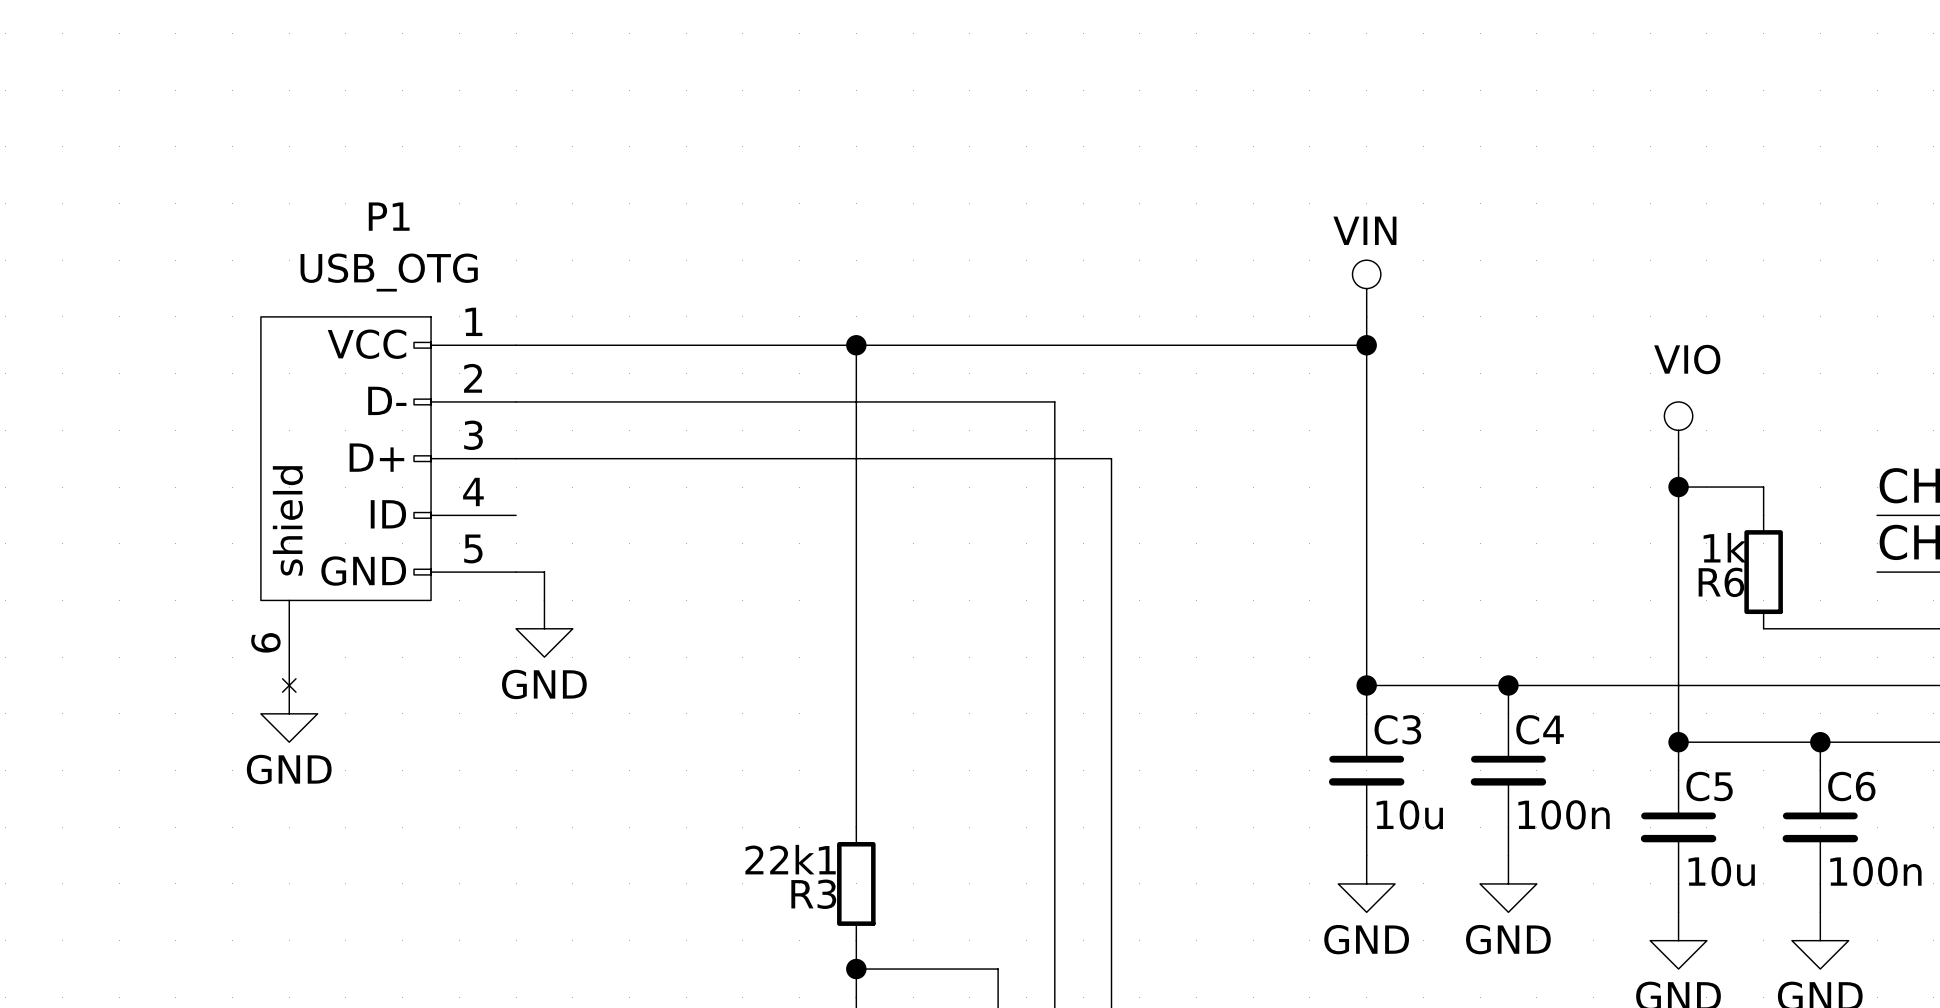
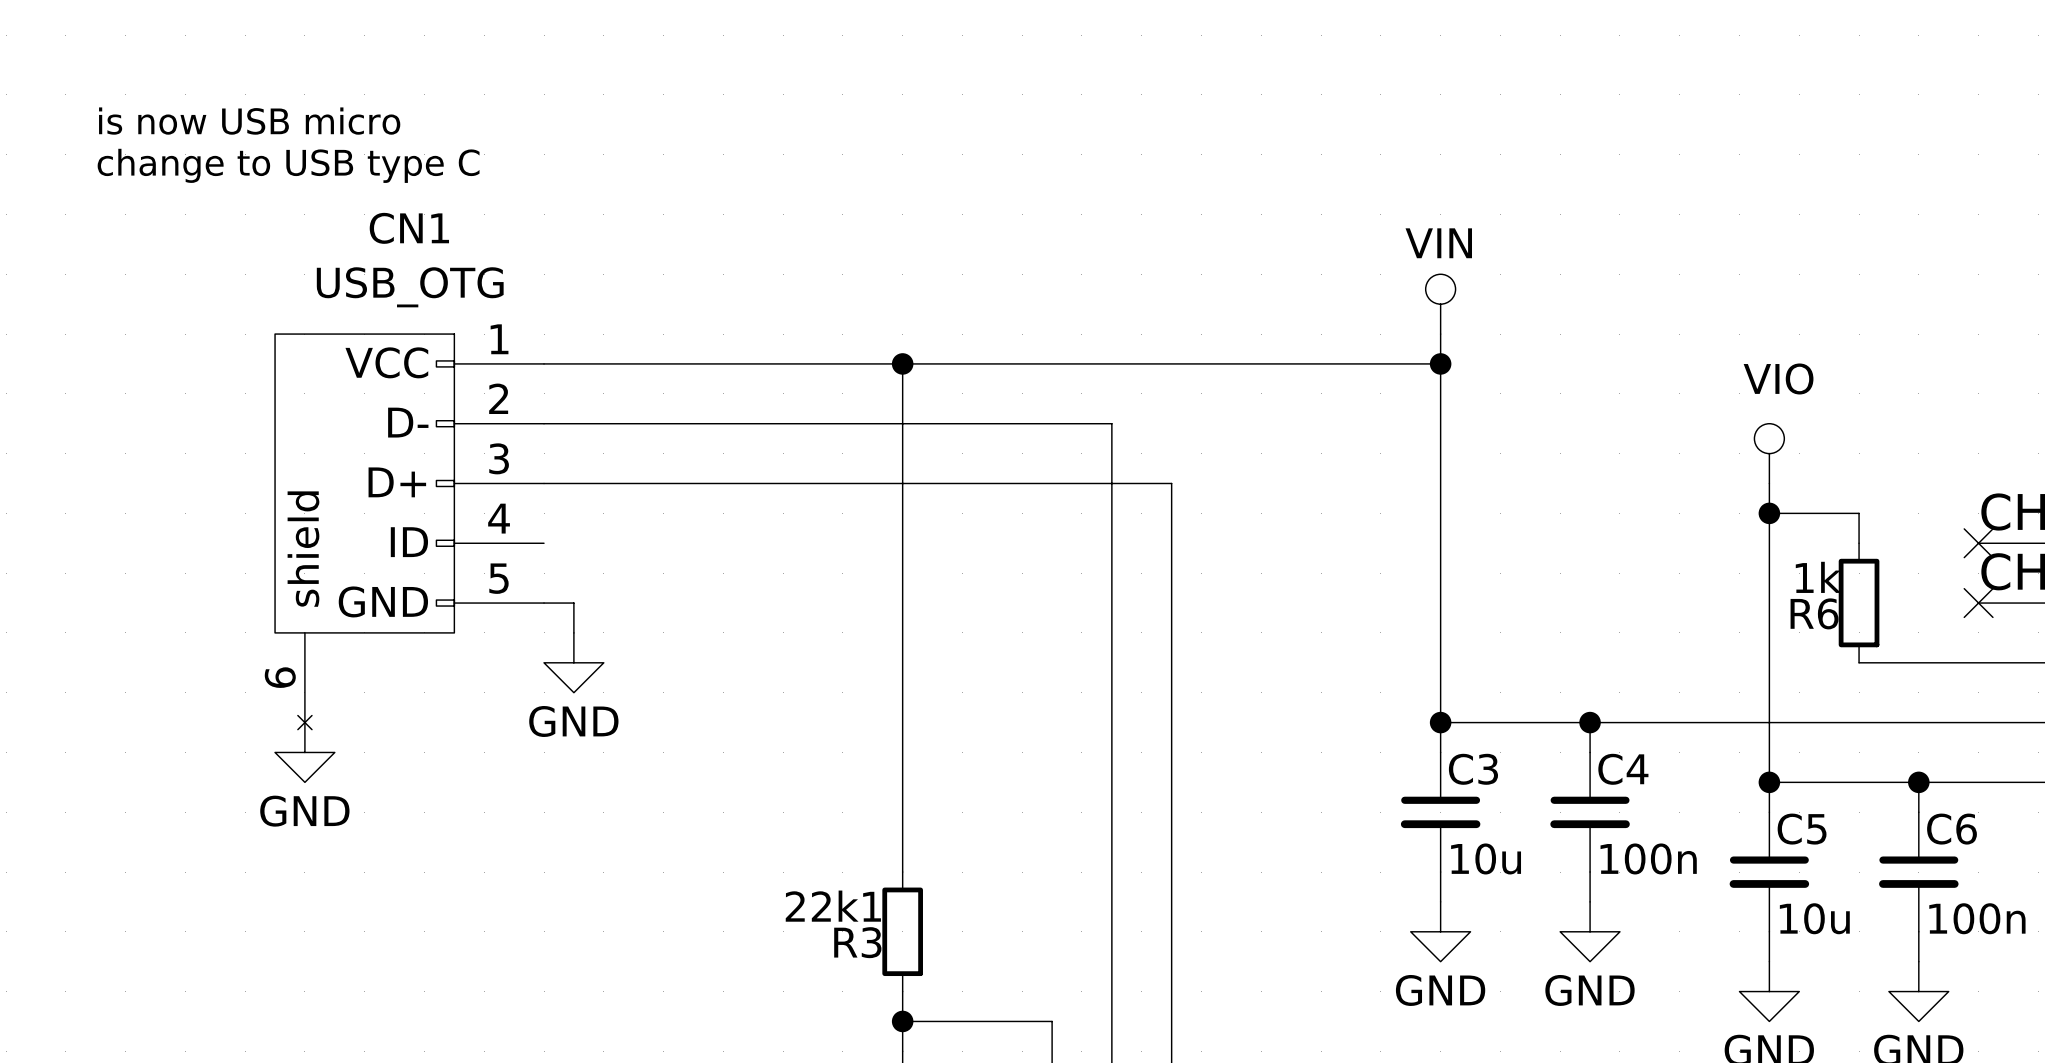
text: none -> is now USB micro (249, 121)
text: none -> change to USB type C (288, 165)
P1 name: P1 (389, 216) -> CN1 (409, 228)
no-connect mark: none -> (1978, 543)
no-connect mark: none -> (1978, 603)

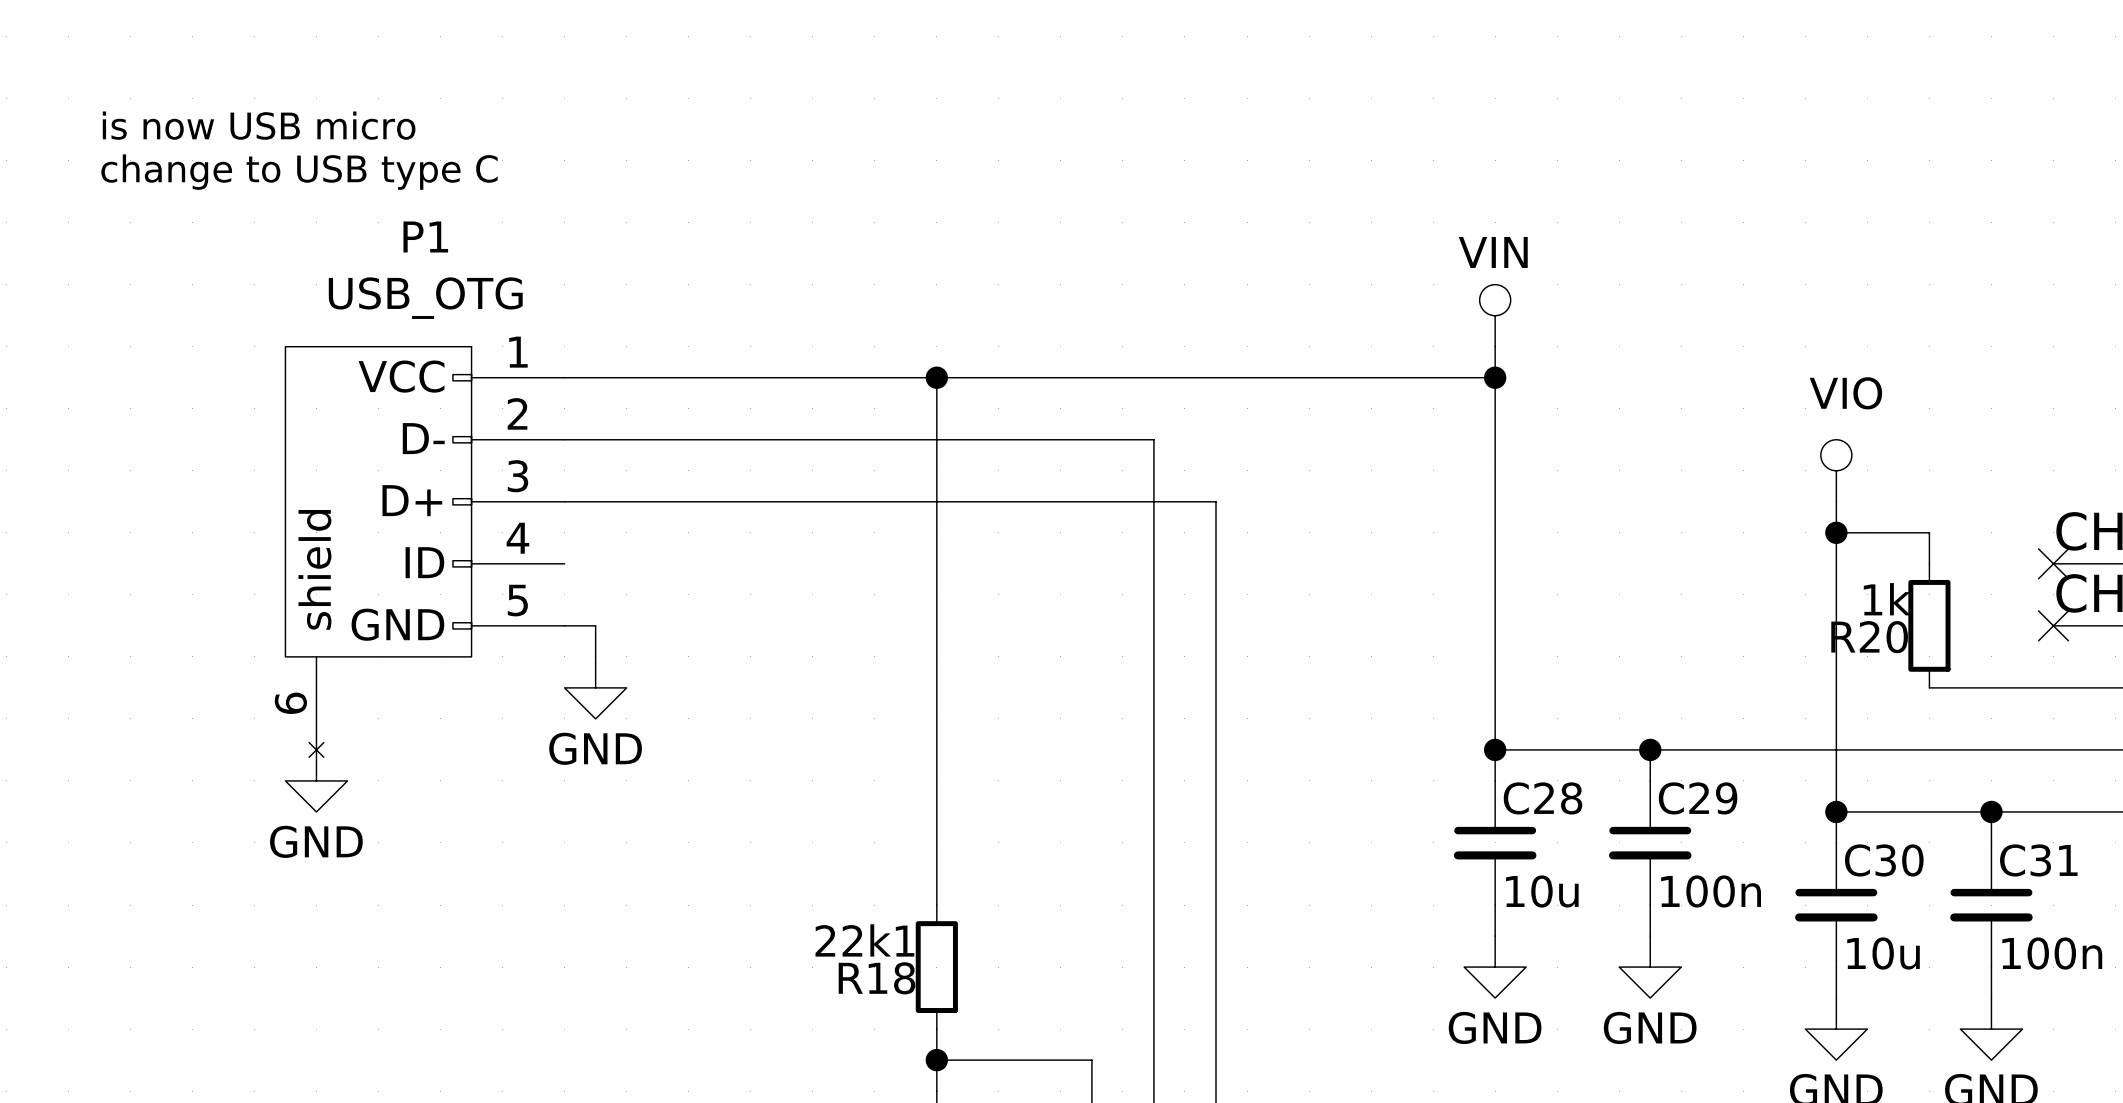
CN1 name: CN1 (409, 228) -> P1 (425, 236)
R6 name: R6 (1814, 613) -> R20 (1869, 637)
C3 name: C3 (1473, 769) -> C28 (1543, 798)
C4 name: C4 (1623, 769) -> C29 (1698, 798)
C5 name: C5 (1802, 829) -> C30 (1884, 860)
C6 name: C6 (1952, 829) -> C31 (2038, 860)
R3 name: R3 (857, 942) -> R18 (877, 978)

